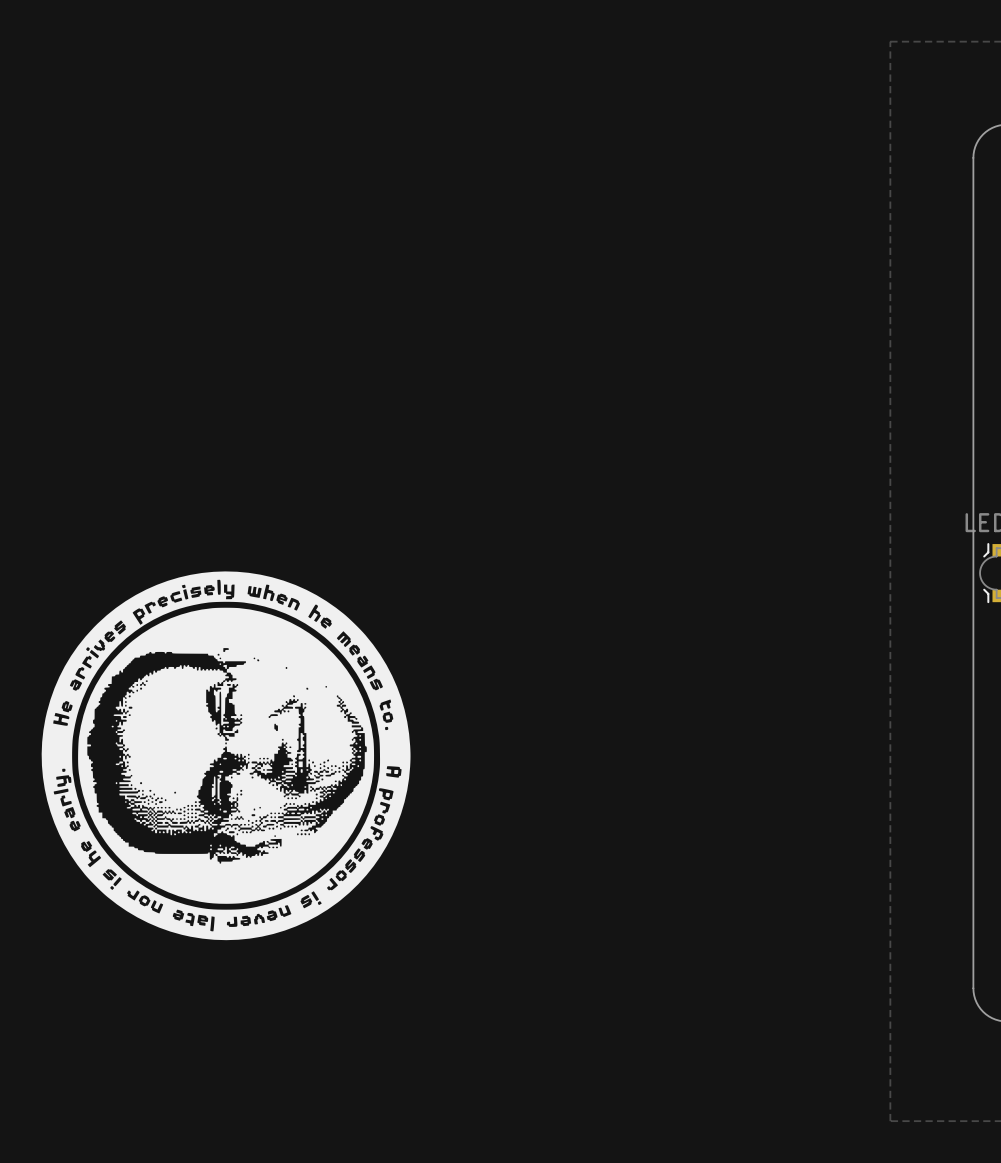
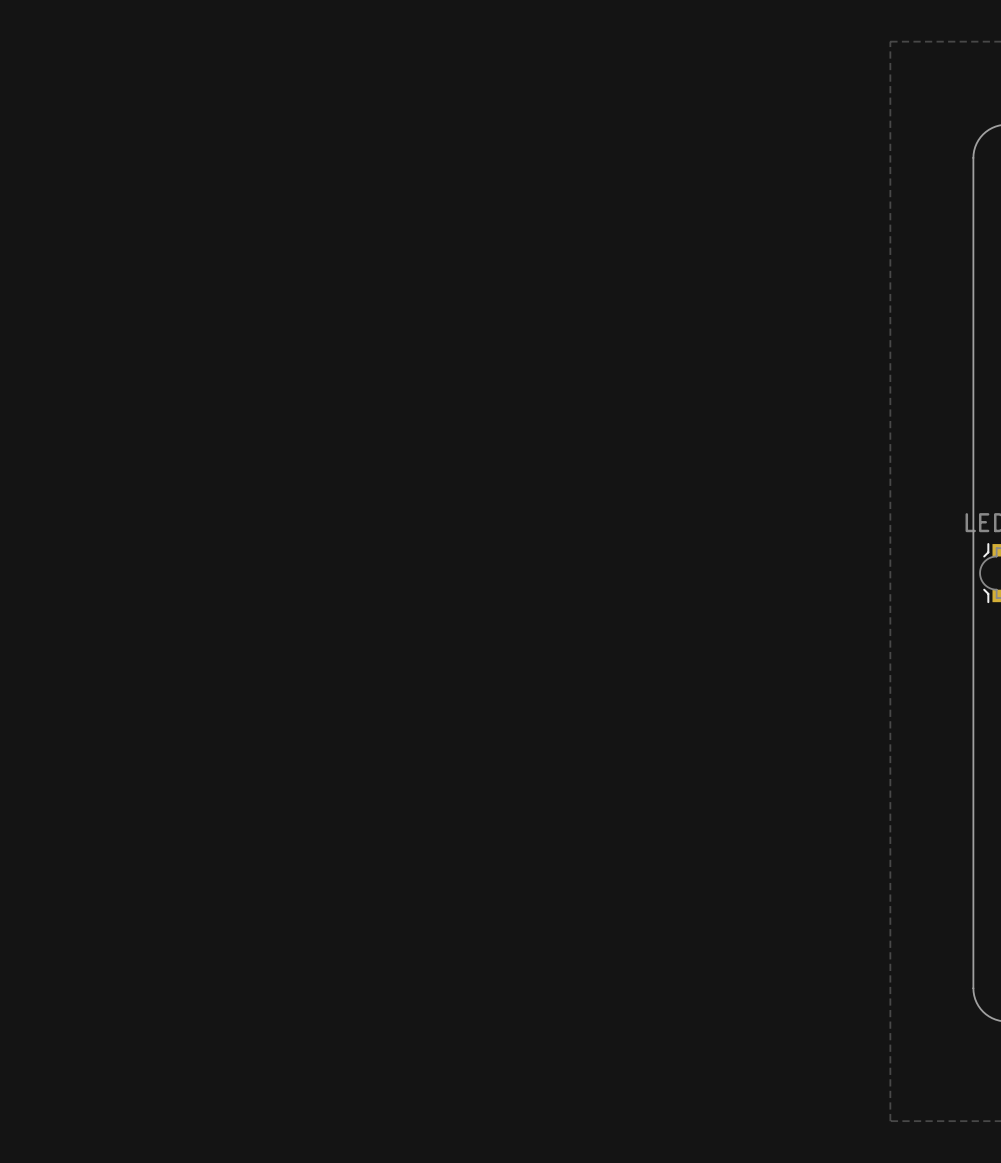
drawing: [41, 571, 411, 941] -> none

